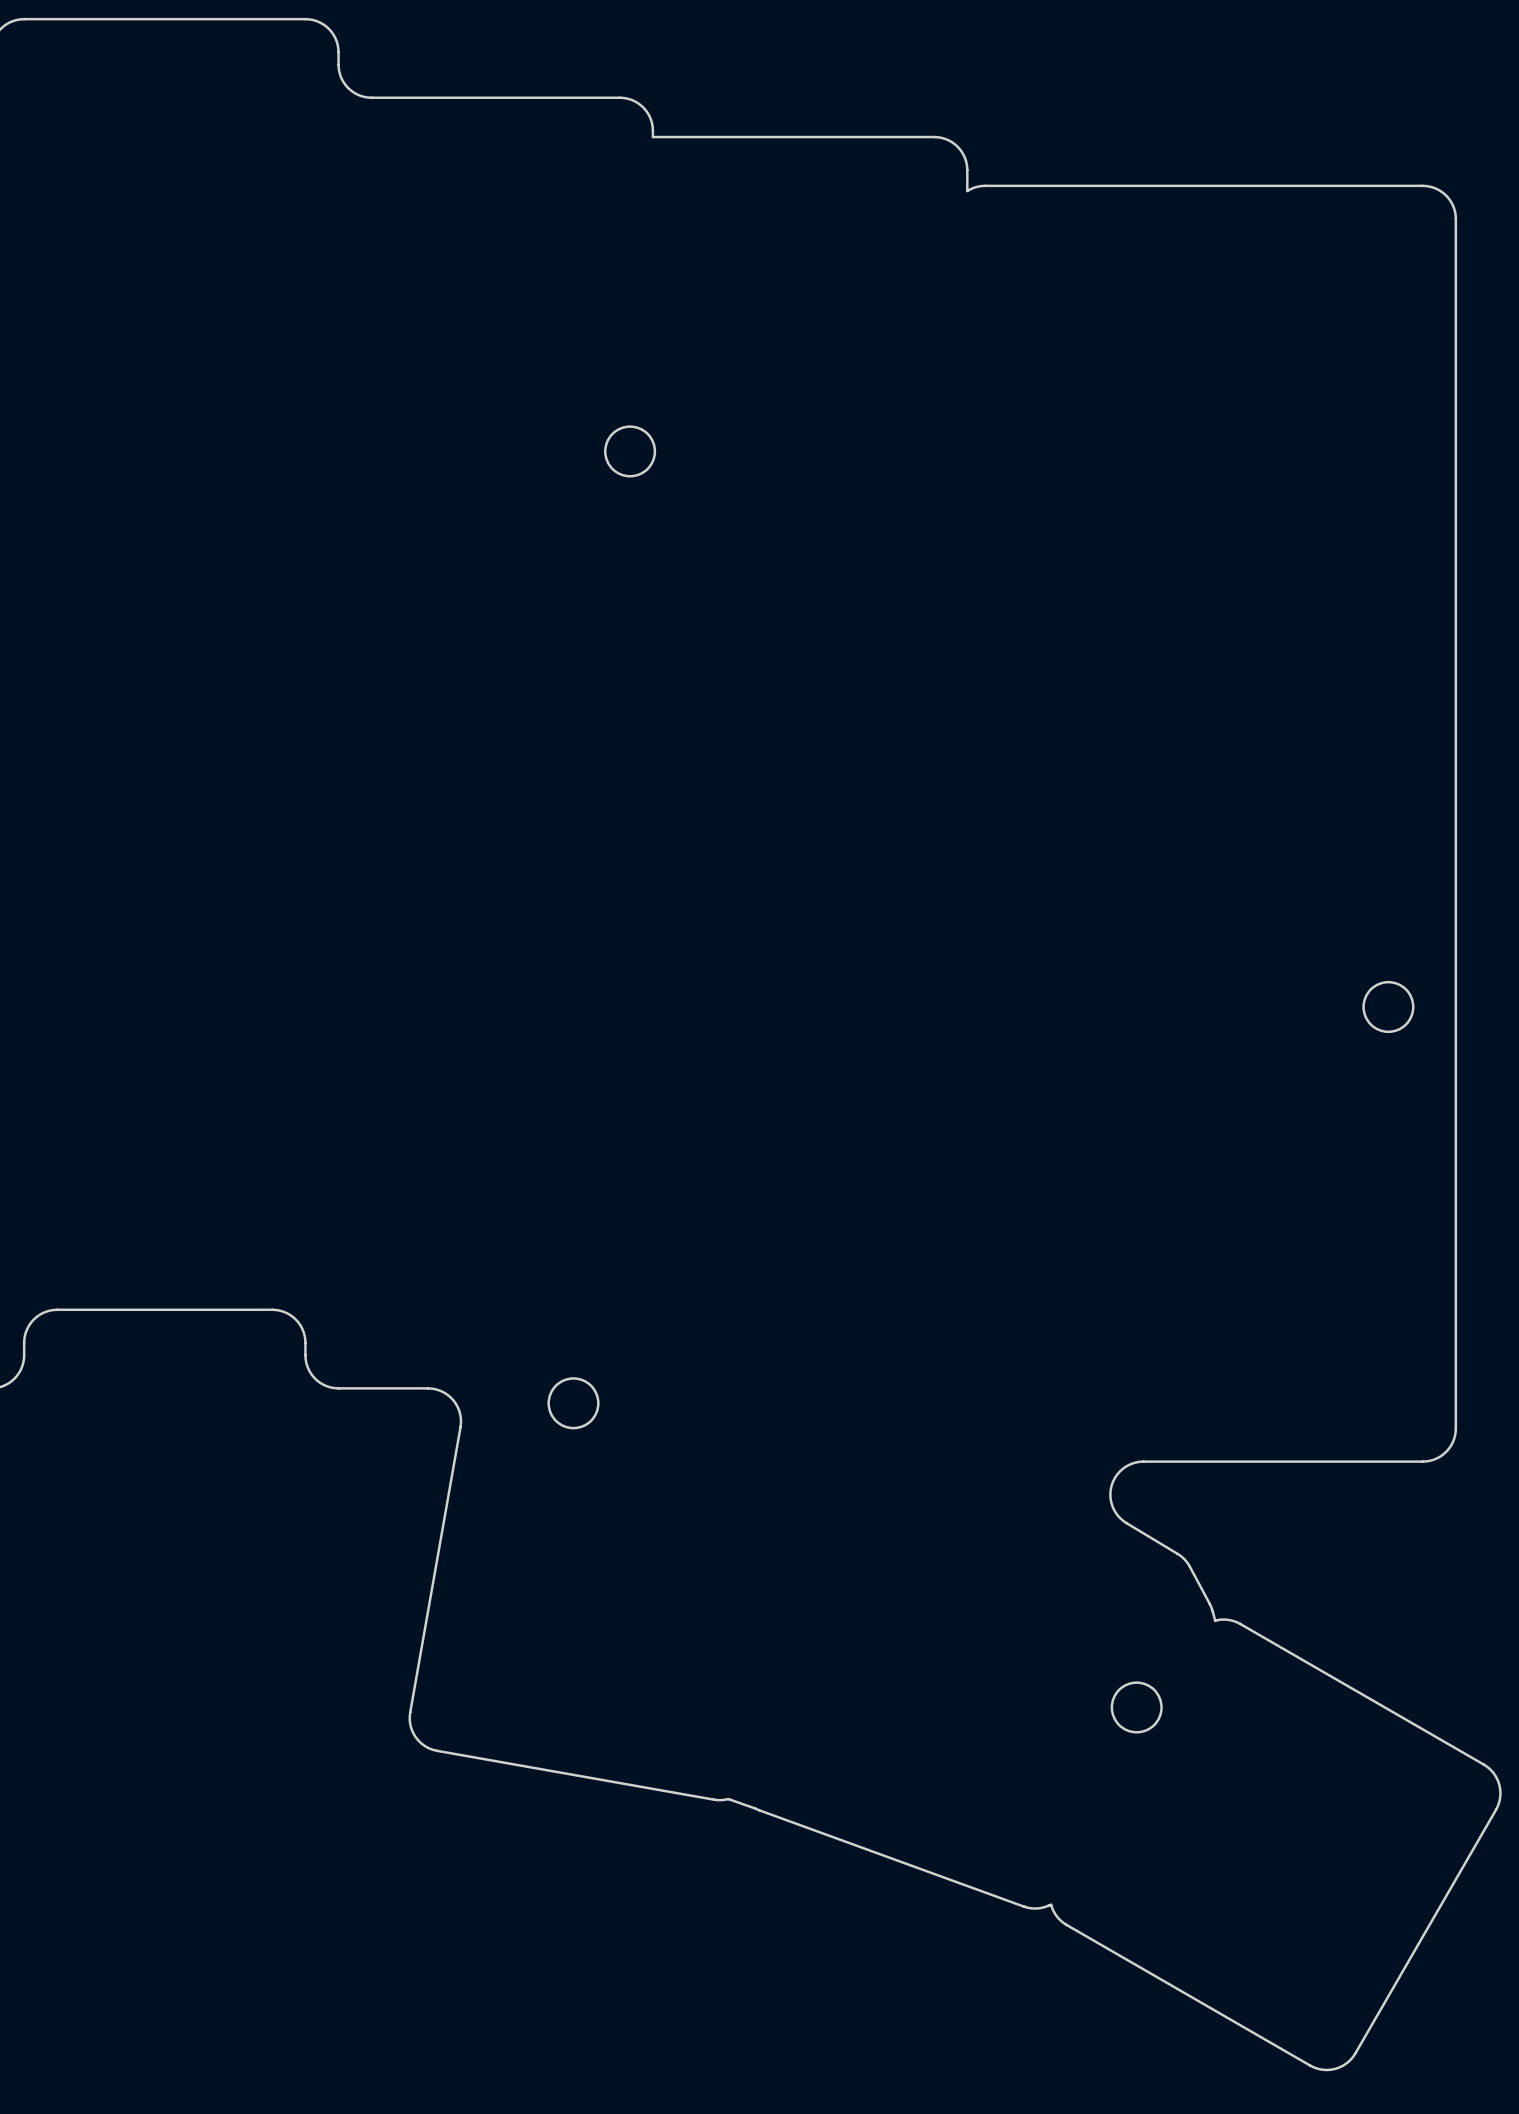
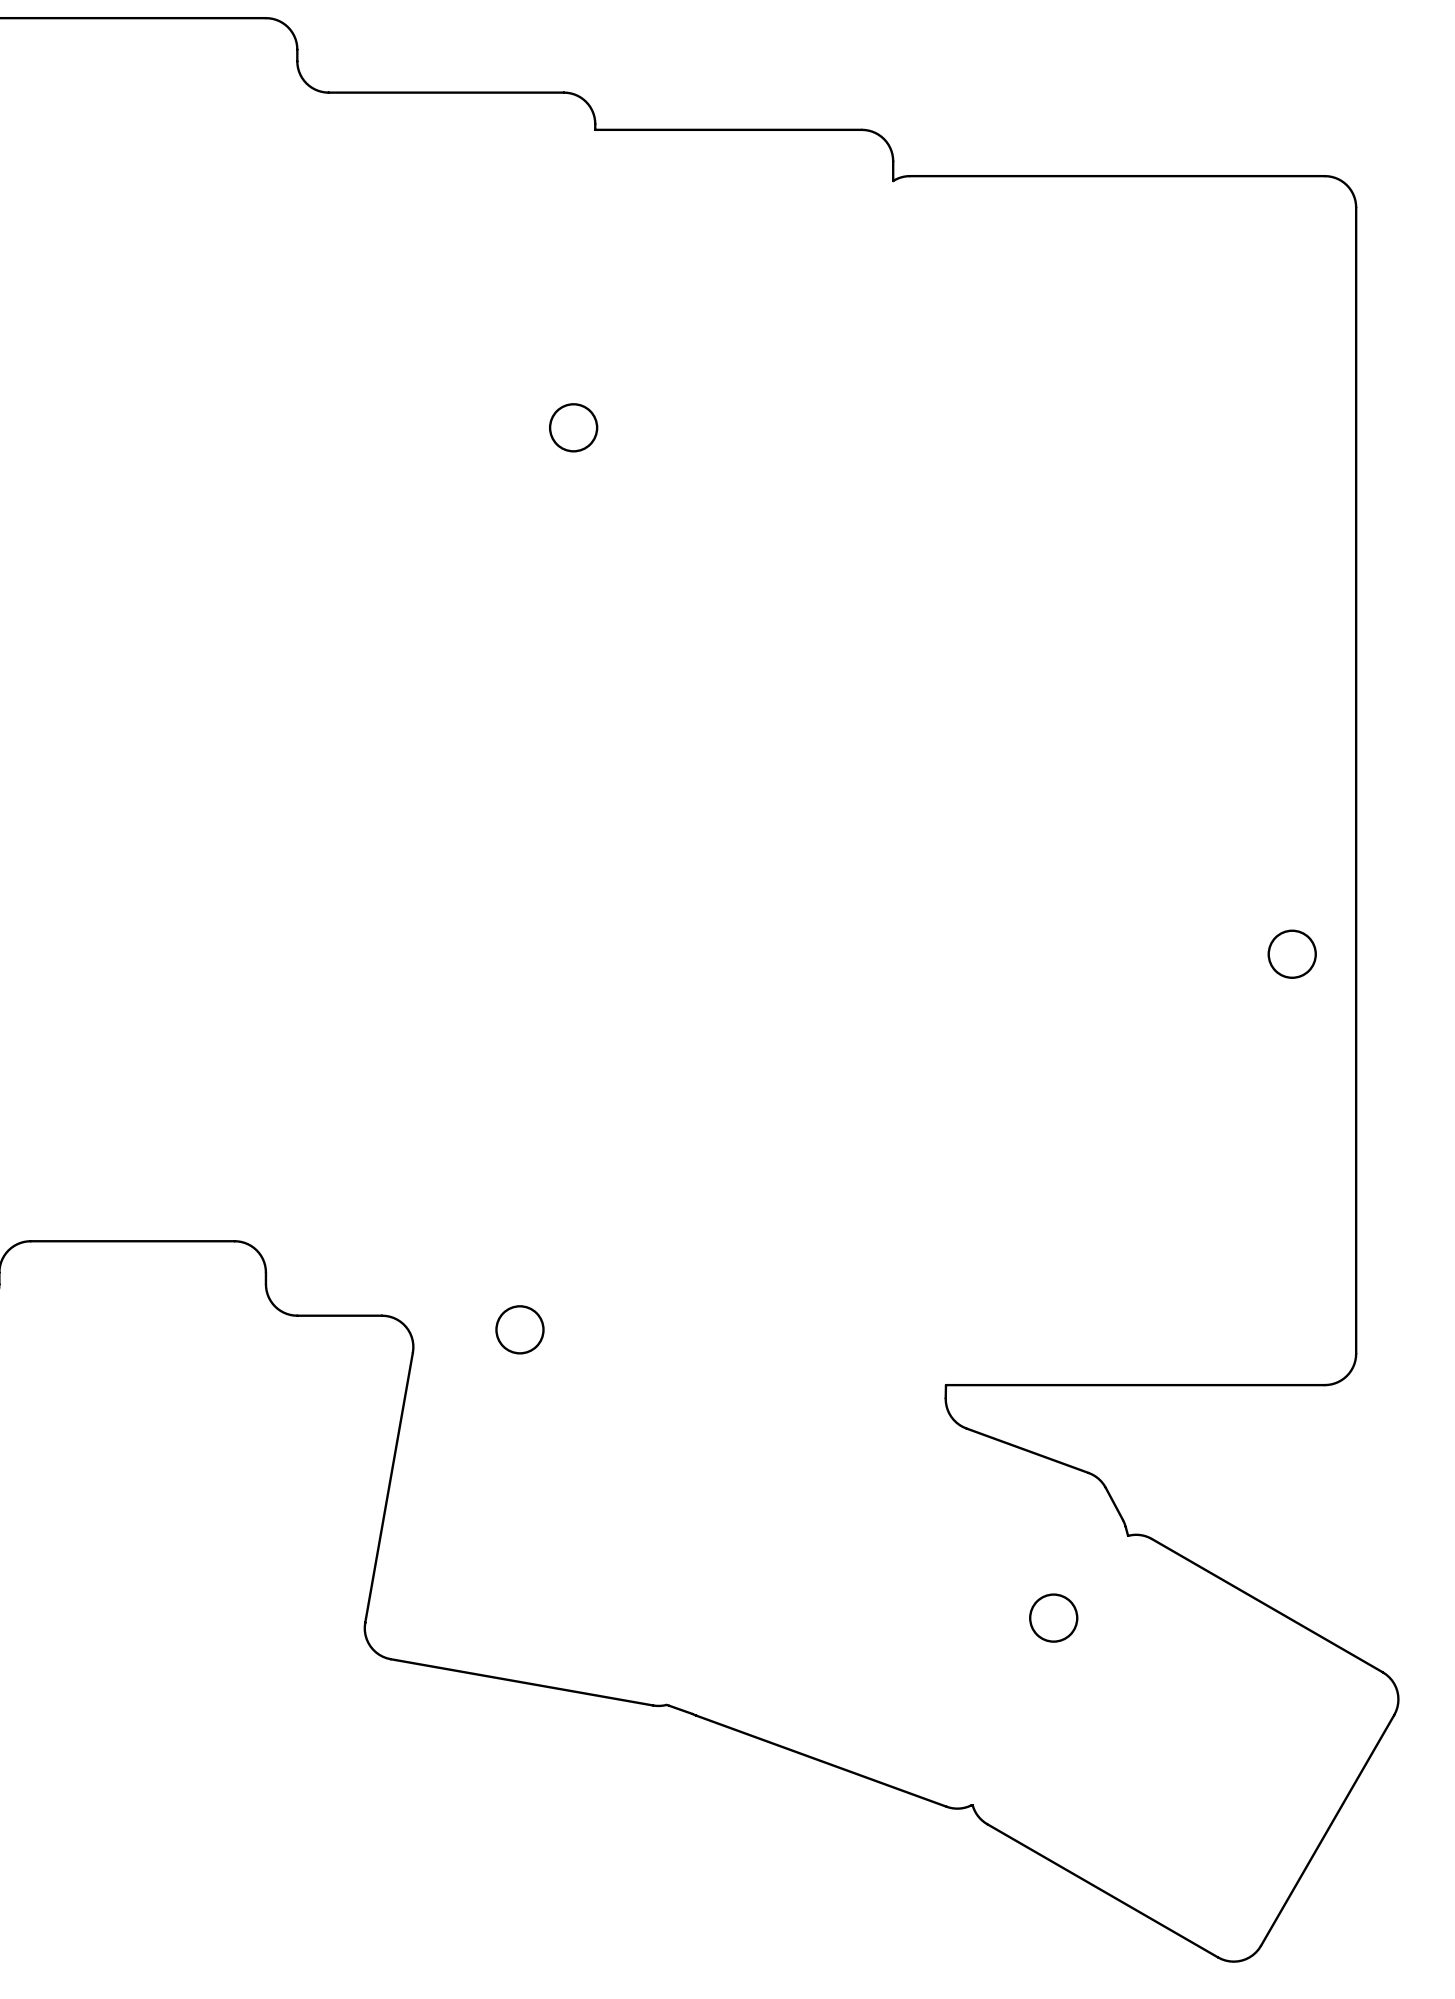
board edge: (1143, 1461) (1130, 1464) (1117, 1474) (1110, 1490) (1112, 1506) (1122, 1520) (1180, 1555) (1191, 1569) -> (1060, 1385) (945, 1385) (945, 1402) (951, 1416) (962, 1426) (1088, 1473) (1098, 1478) (1105, 1487)

